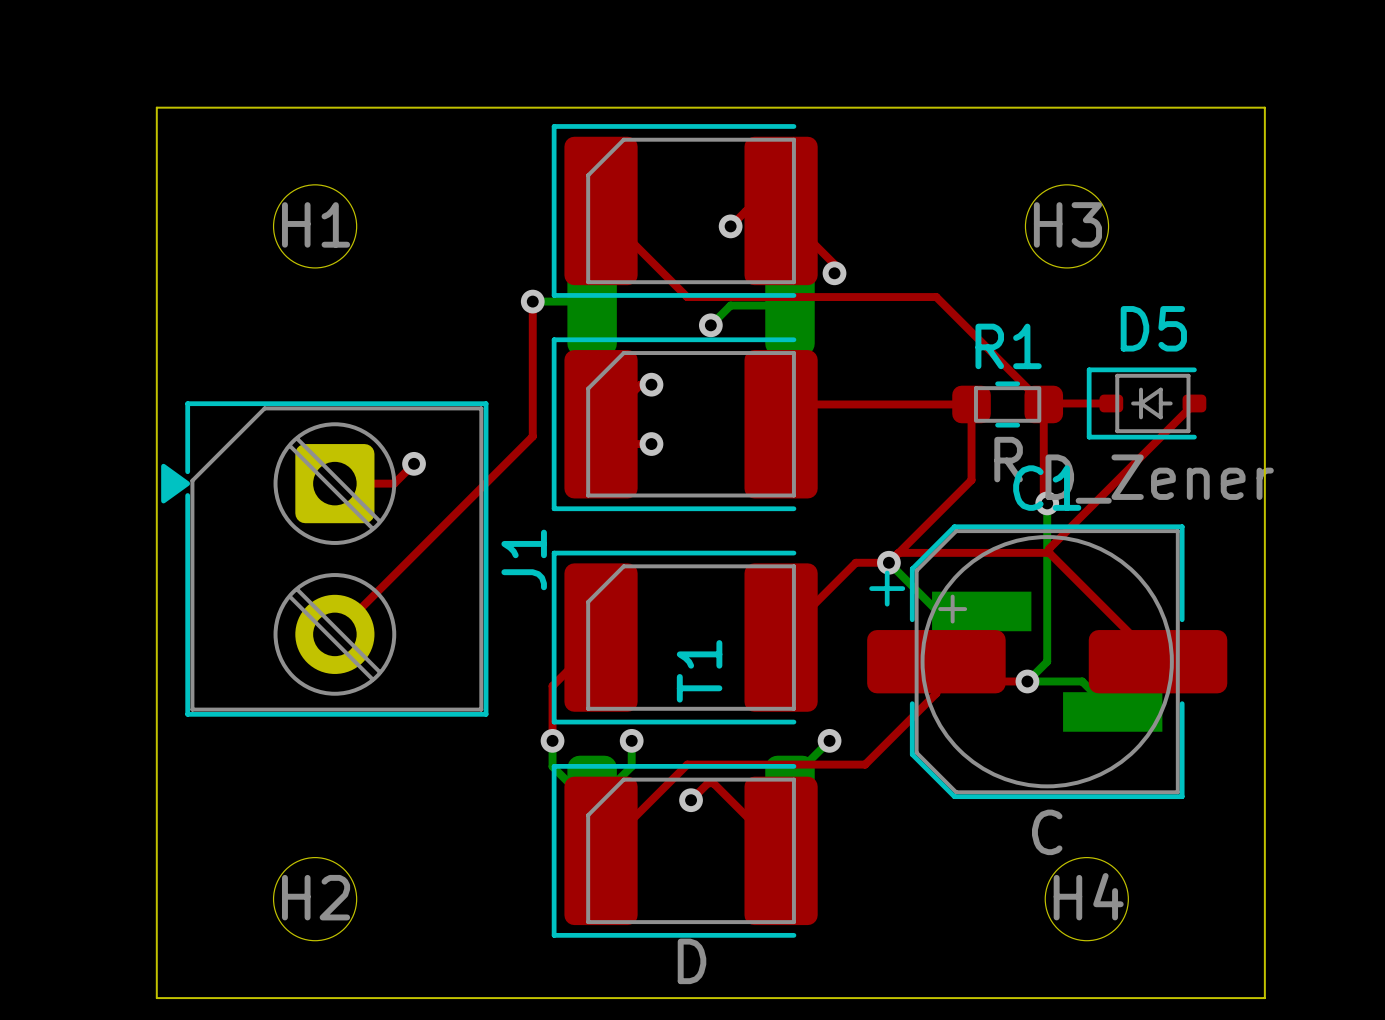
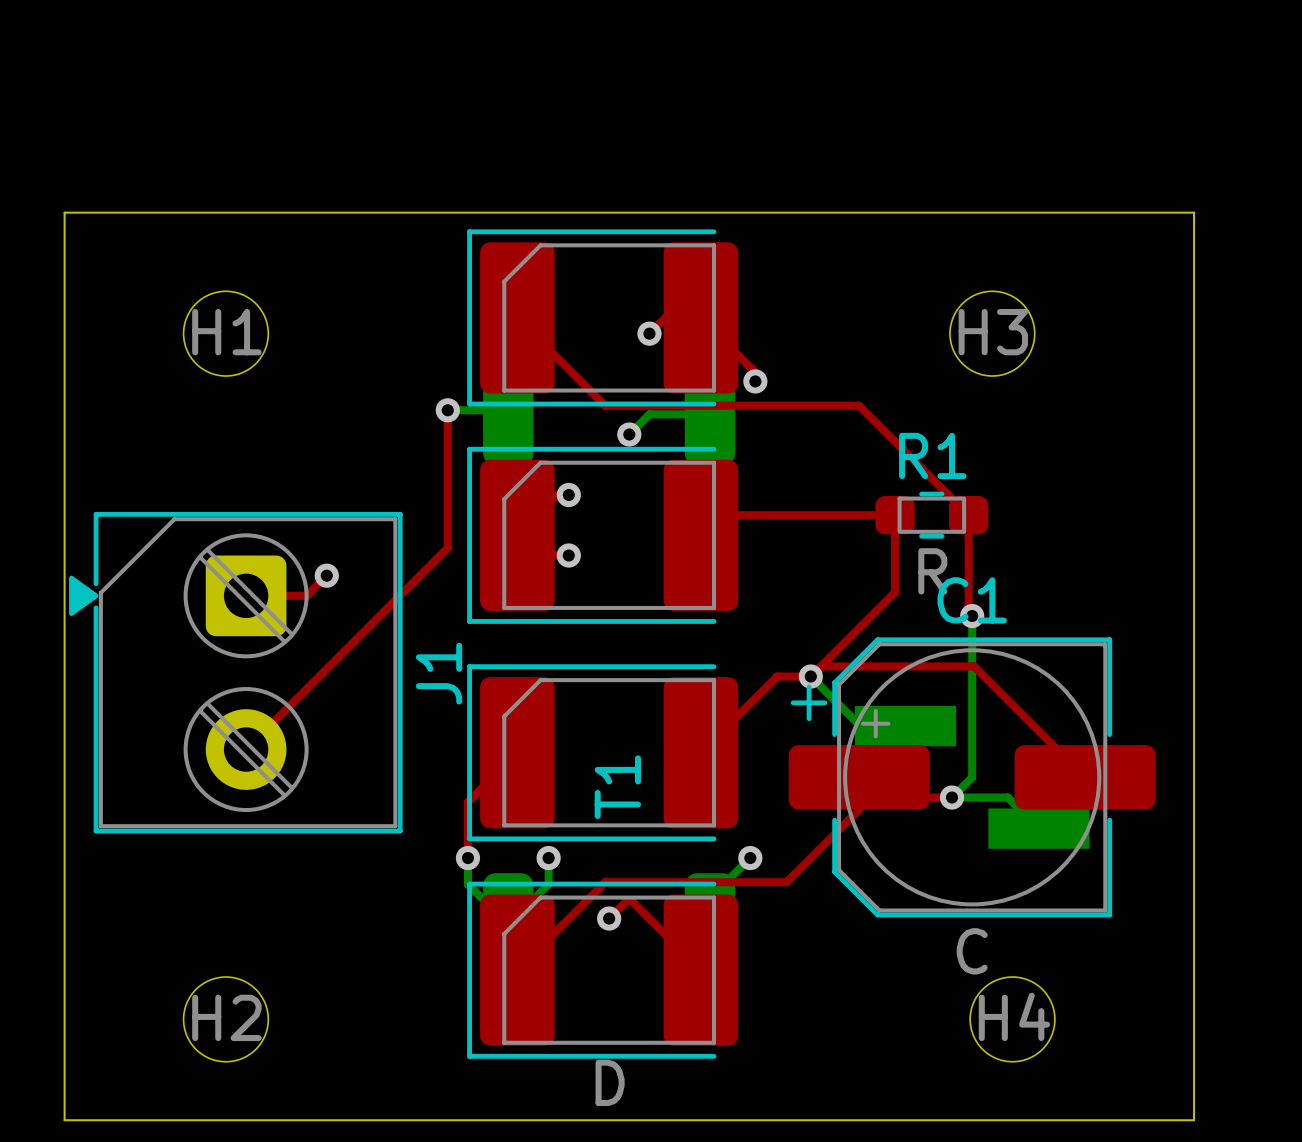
top track: (1111, 403) (1043, 404) -> none
D5: D_Zener (1146, 403) -> none
top track: (1194, 403) (1049, 548) (1049, 552) -> none

